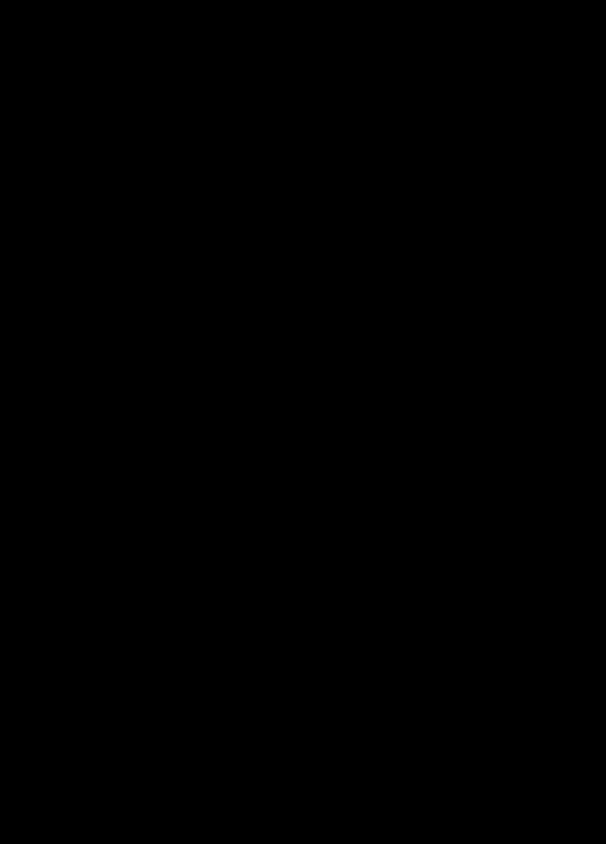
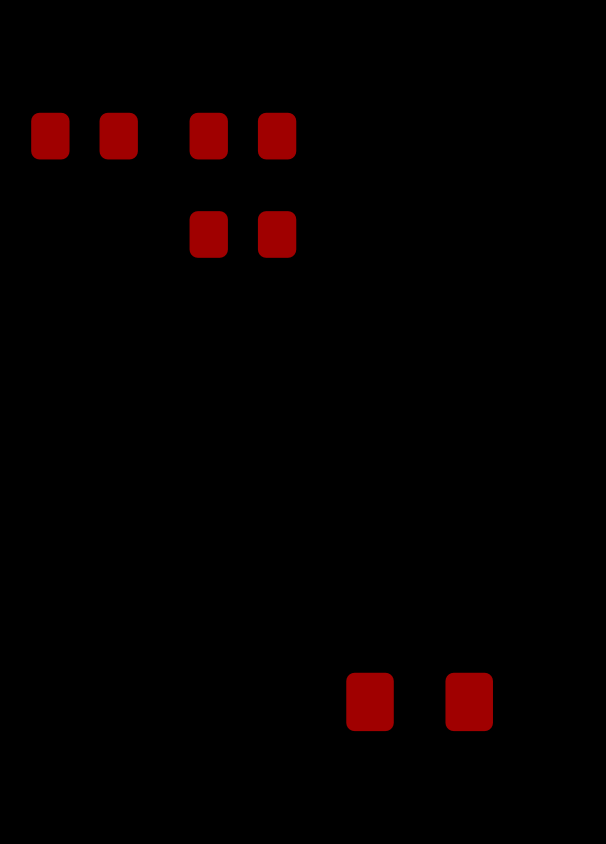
part: none -> (84, 136)
part: none -> (242, 136)
part: none -> (242, 234)
part: none -> (419, 701)

